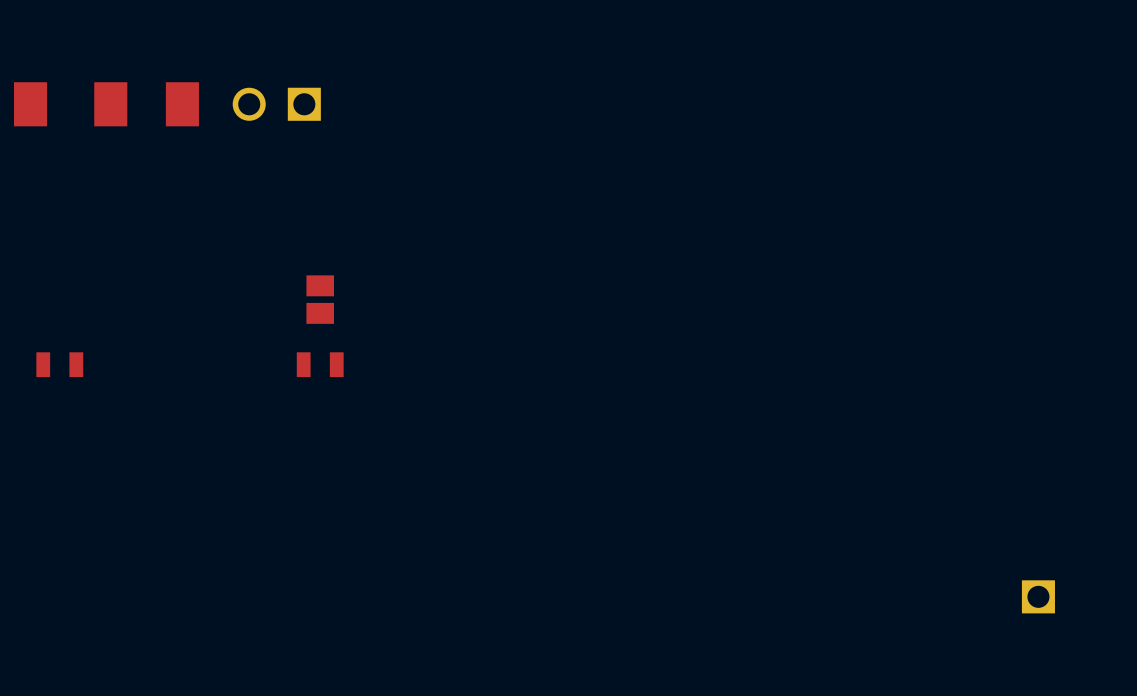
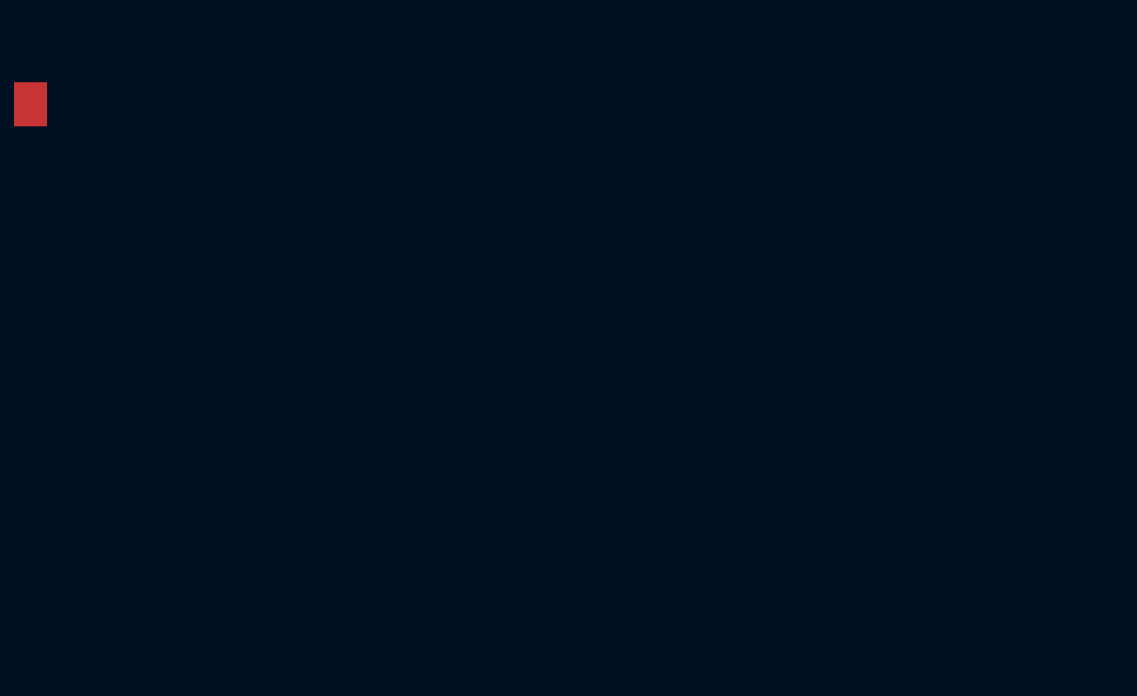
part: (146, 104) -> none
part: (276, 104) -> none
part: (320, 299) -> none
part: (59, 364) -> none
part: (320, 364) -> none
part: (1038, 596) -> none

